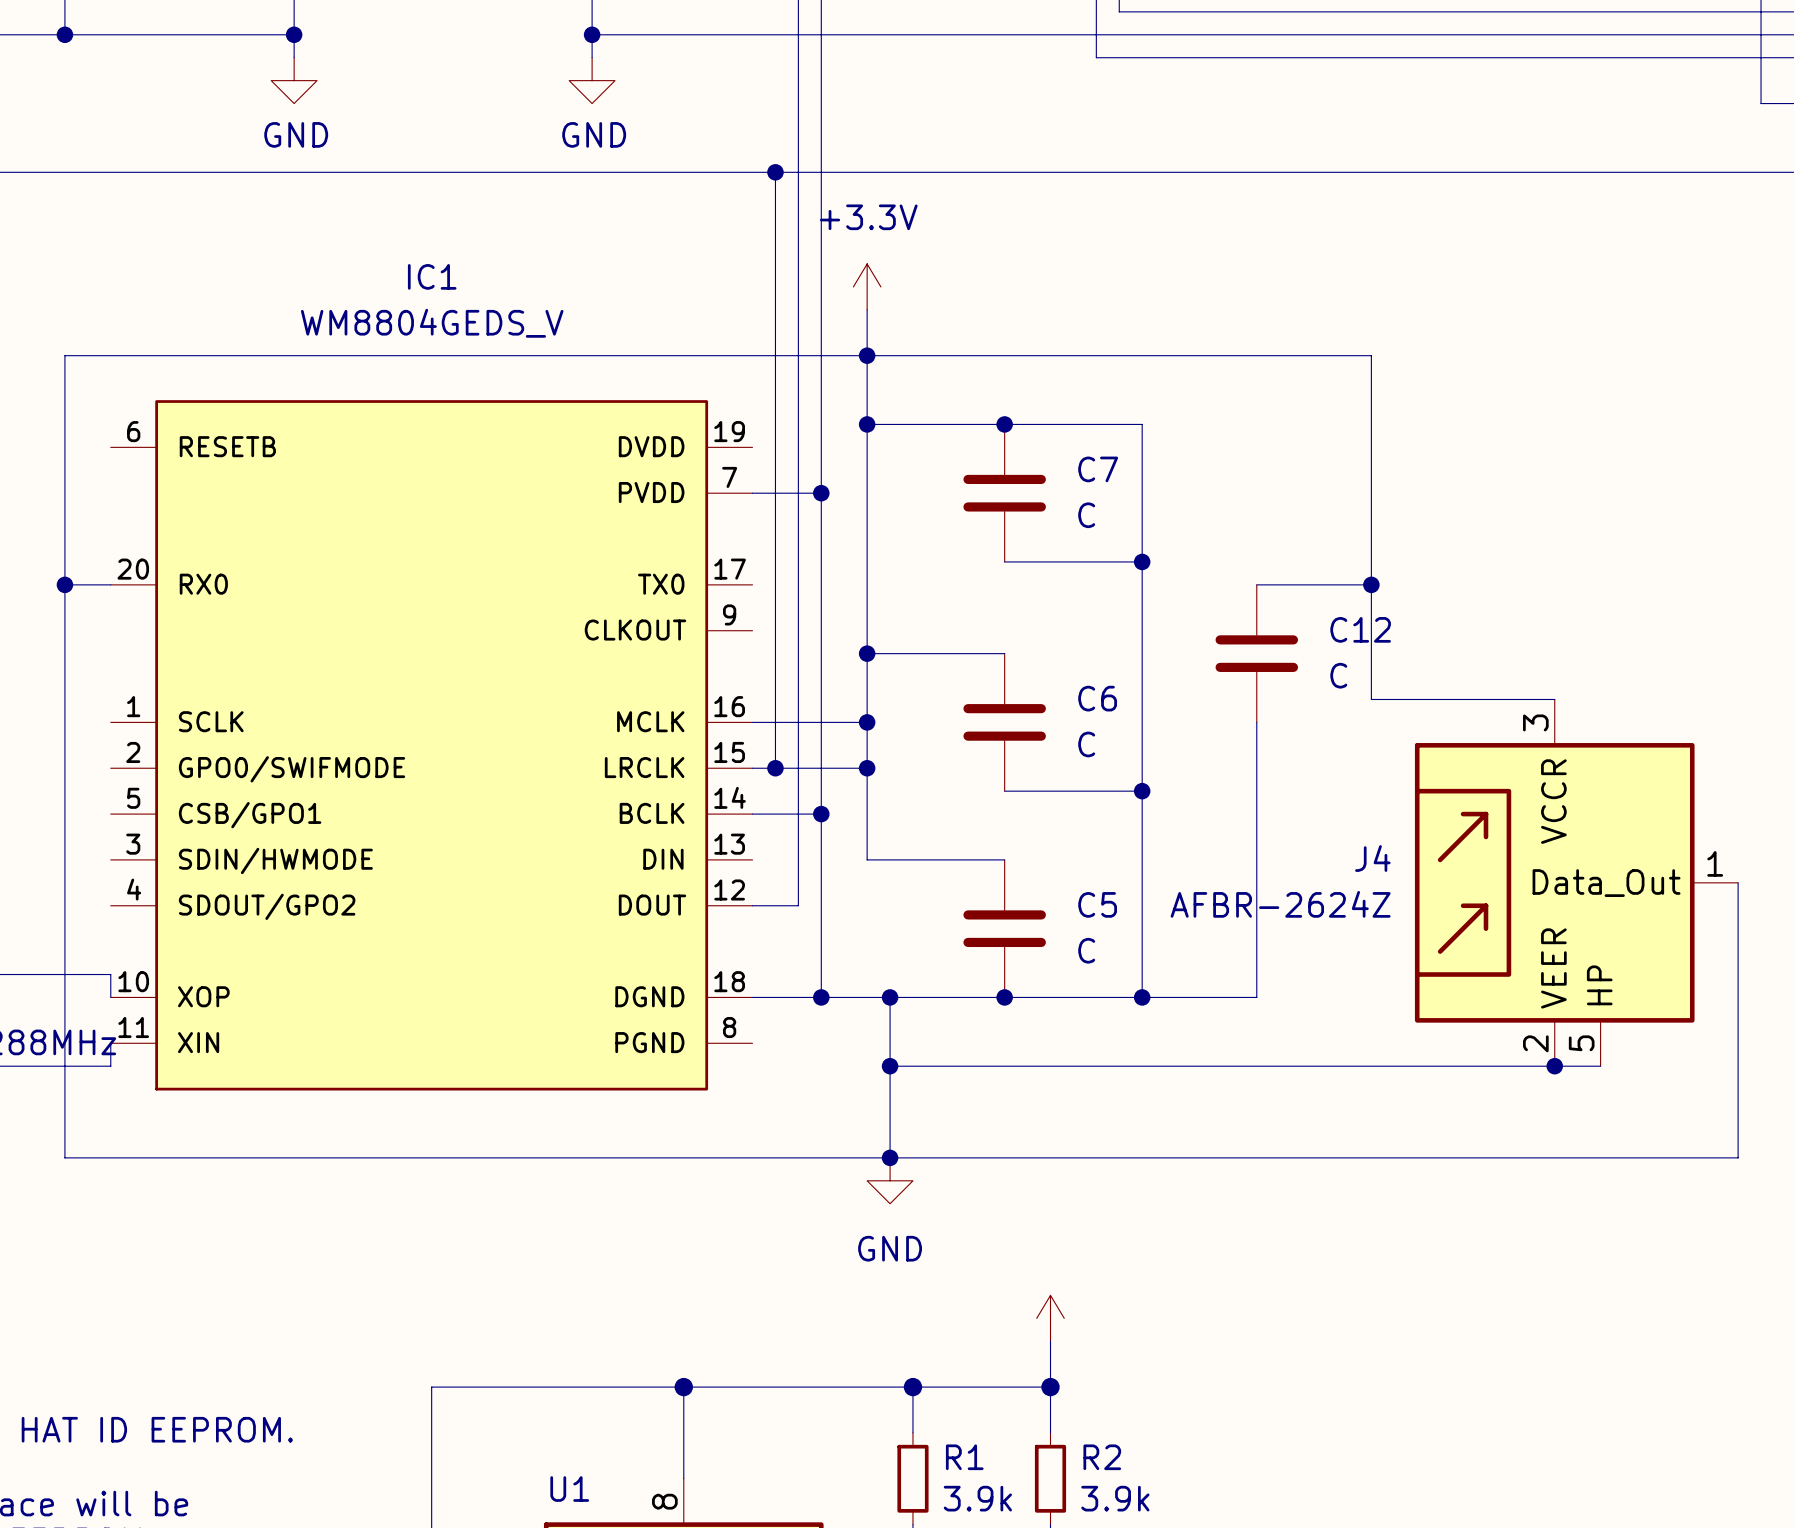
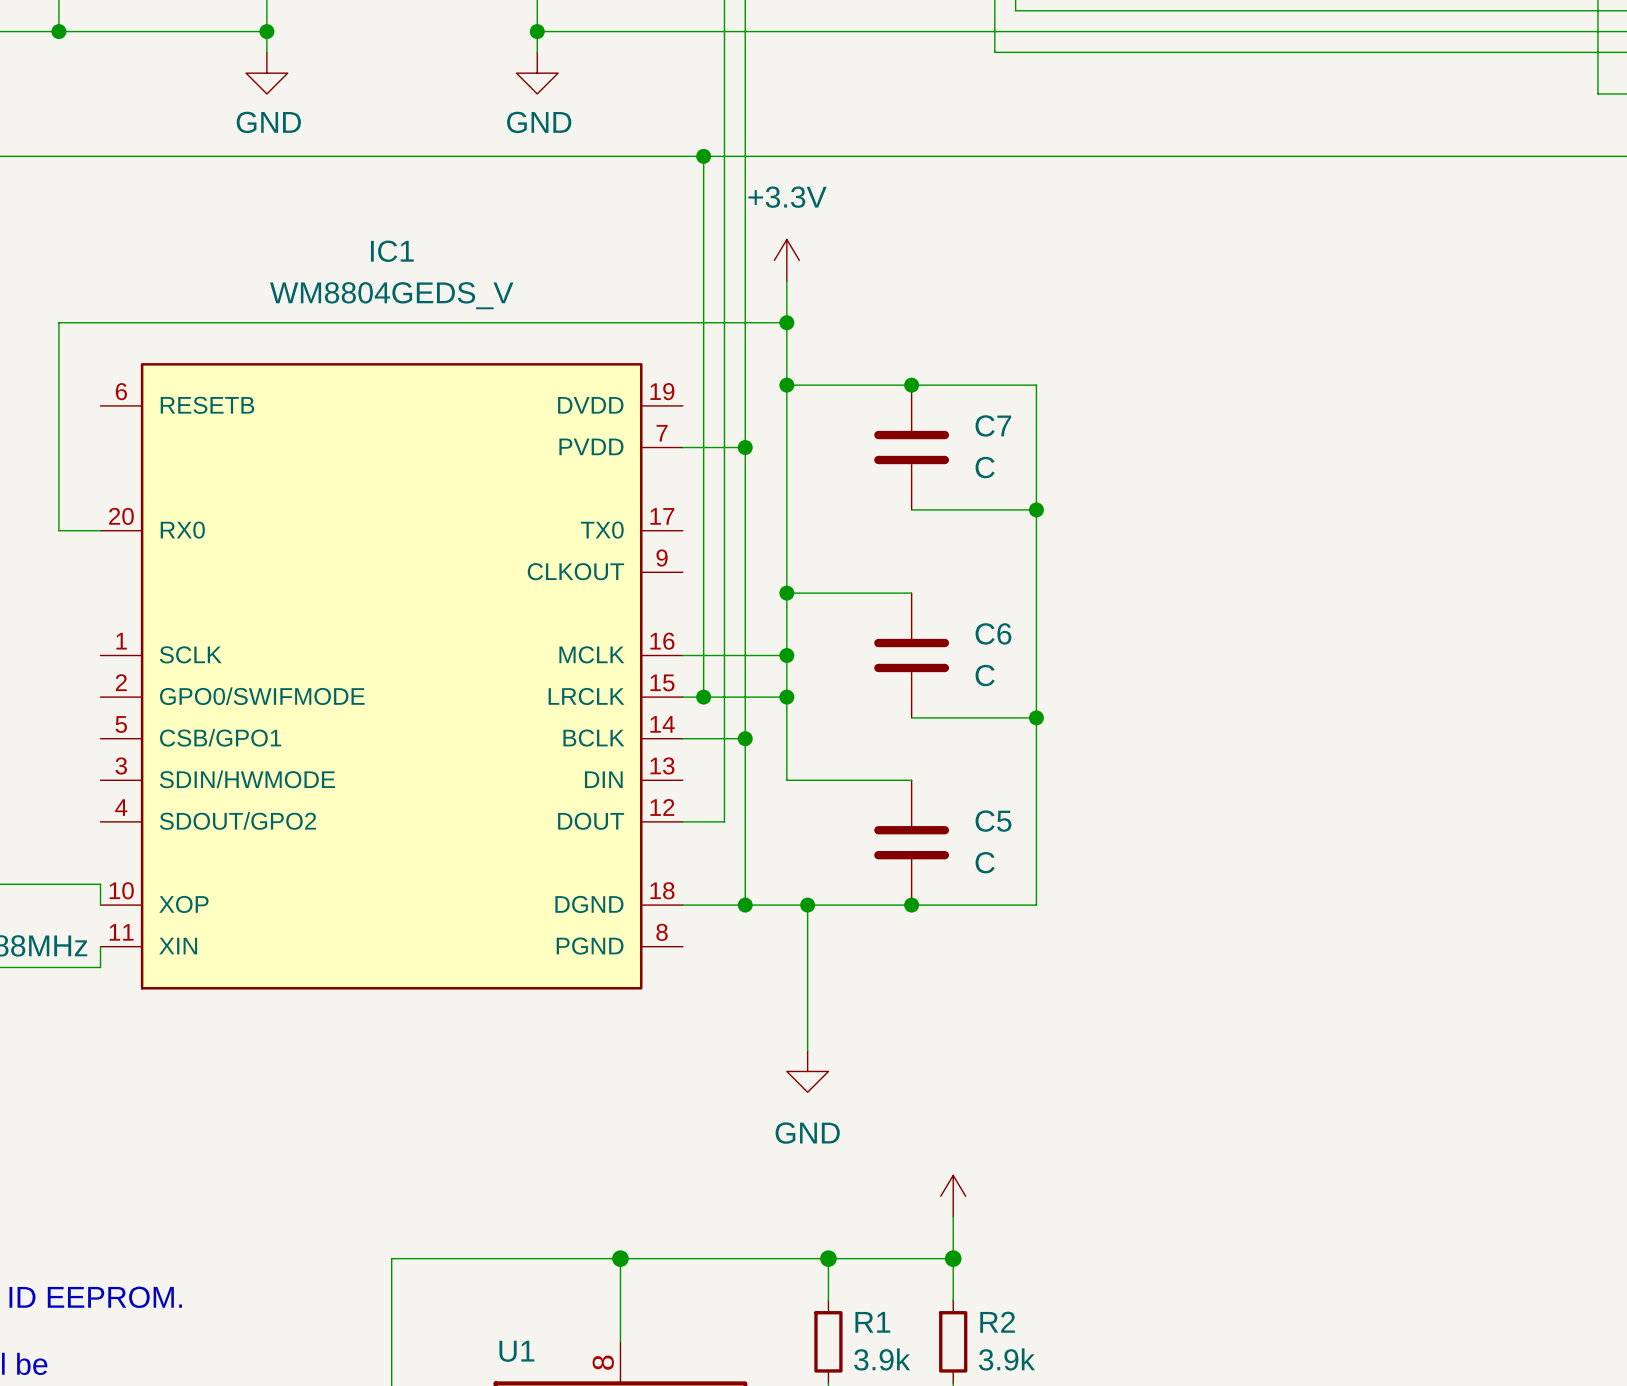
wire: (867, 355) (1371, 355) (1371, 699) (1554, 699) -> none
wire: (64, 584) (64, 1157) (1738, 1157) (1738, 882) -> none
junction: (64, 584) -> none
wire: (1256, 584) (1371, 584) -> none
junction: (1371, 584) -> none
C12: C (1256, 653) -> none
wire: (1256, 722) (1256, 997) (1142, 997) -> none
J4: AFBR-2624Z (1576, 882) -> none
junction: (1142, 997) -> none
wire: (890, 1066) (1600, 1066) -> none
junction: (890, 1066) -> none
junction: (1554, 1066) -> none
junction: (890, 1157) -> none

